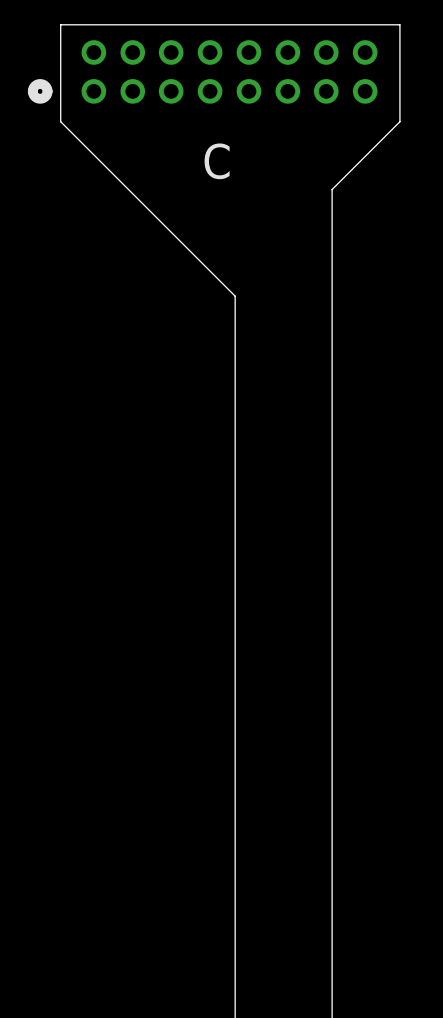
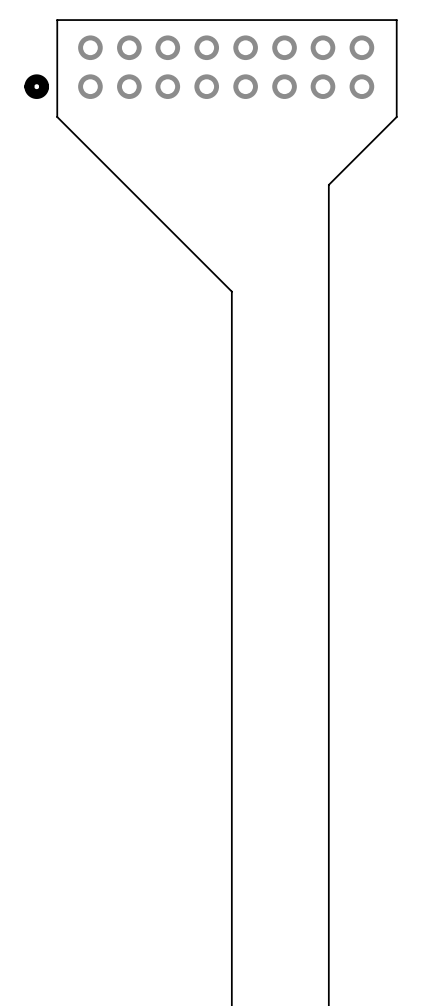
text: C (217, 161) -> none

